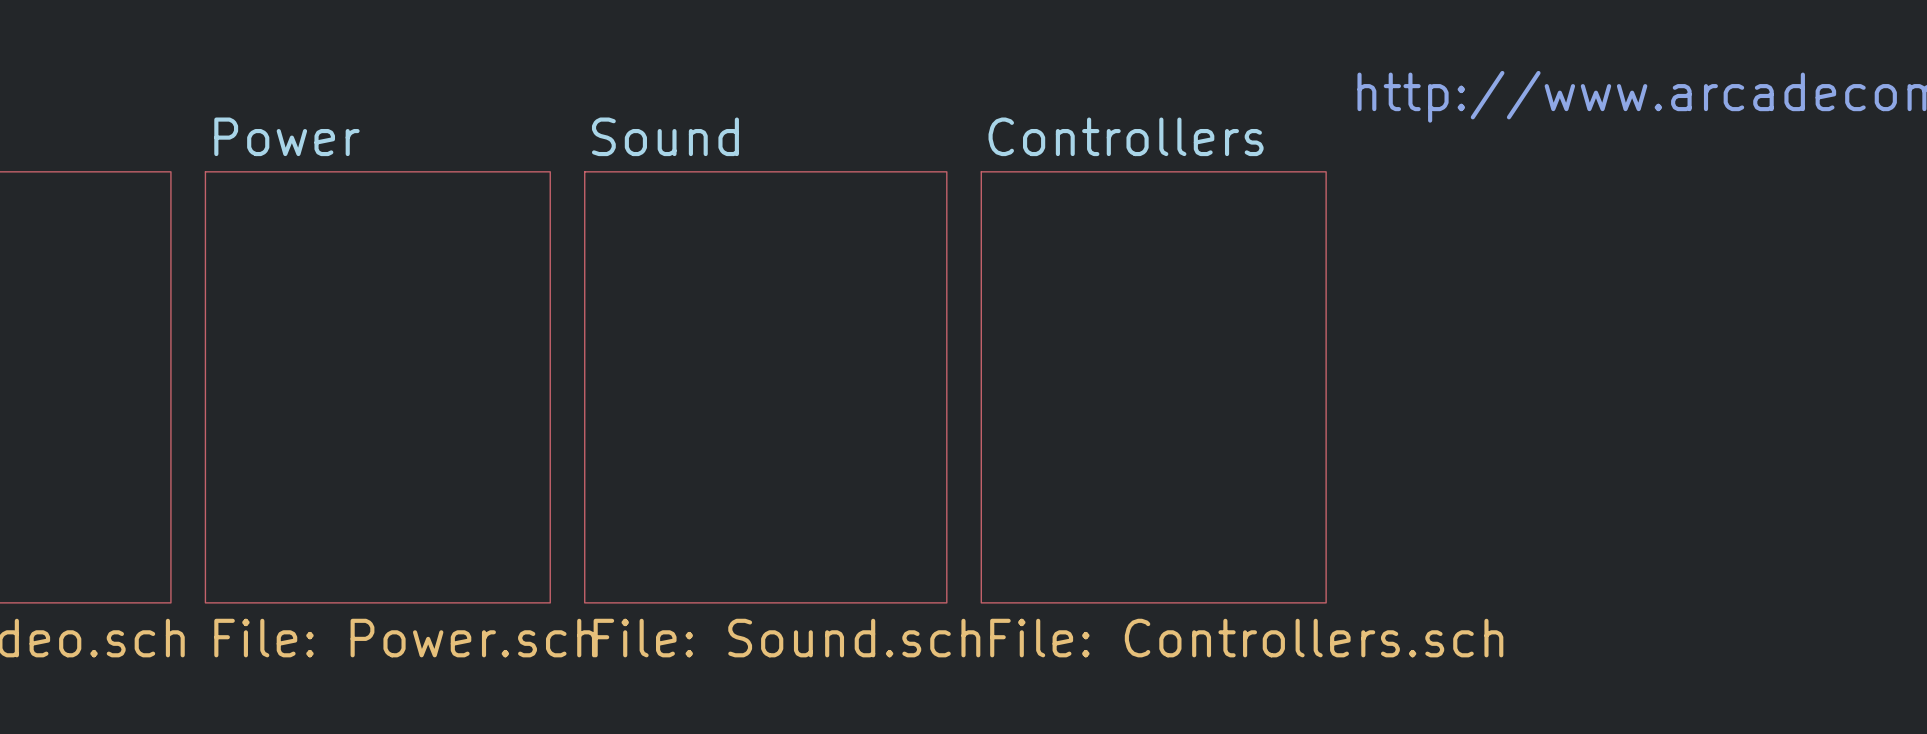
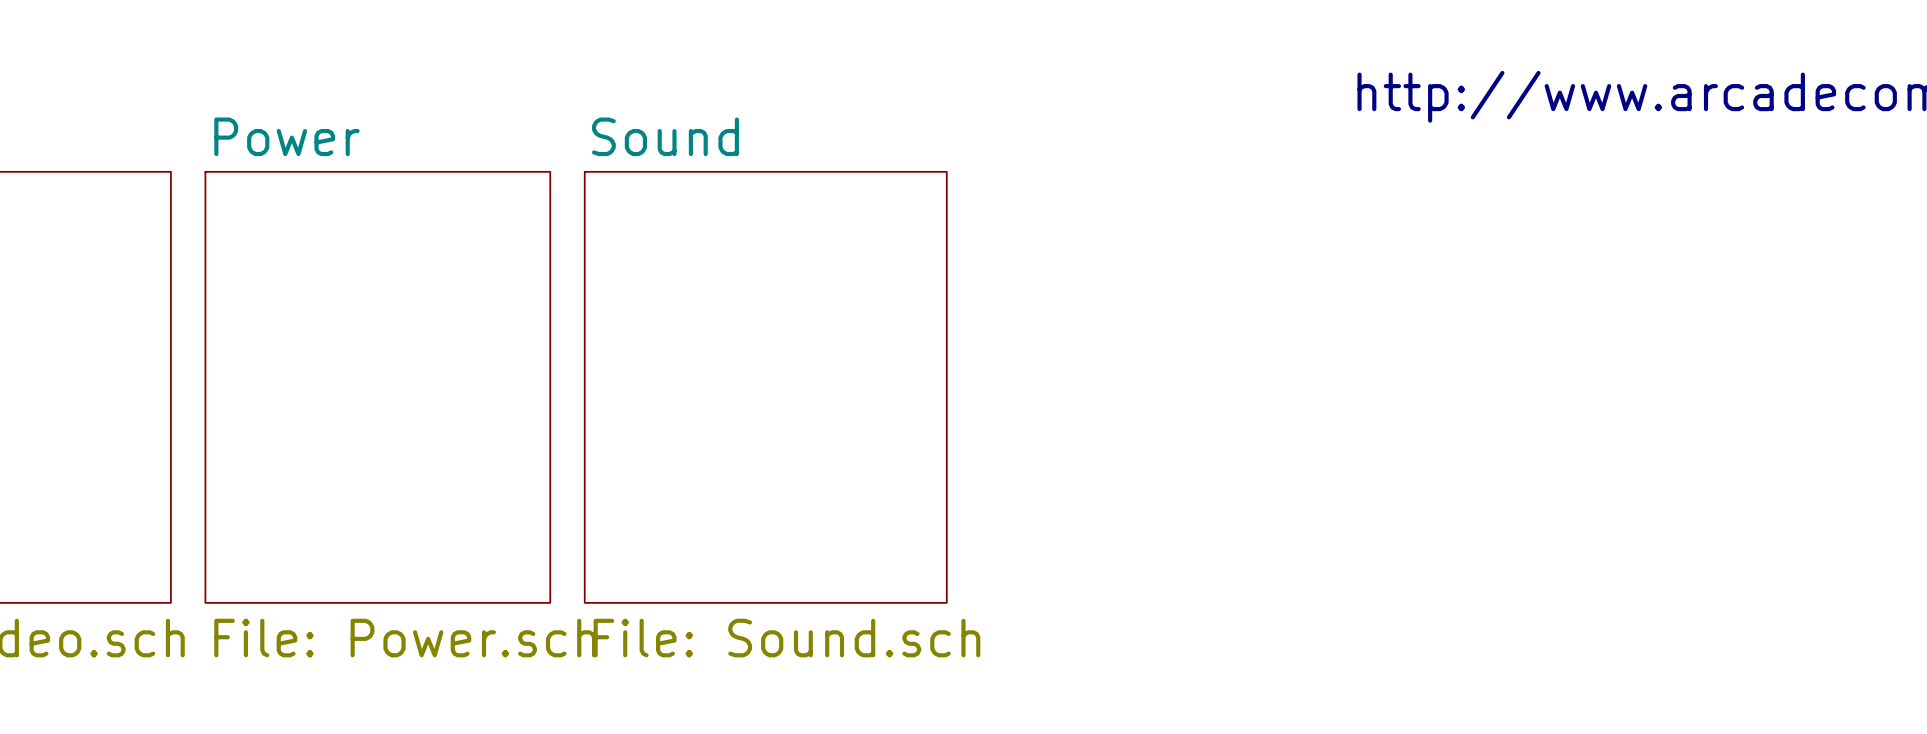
sheet Controllers: File: Controllers.sch (1153, 387) -> none

